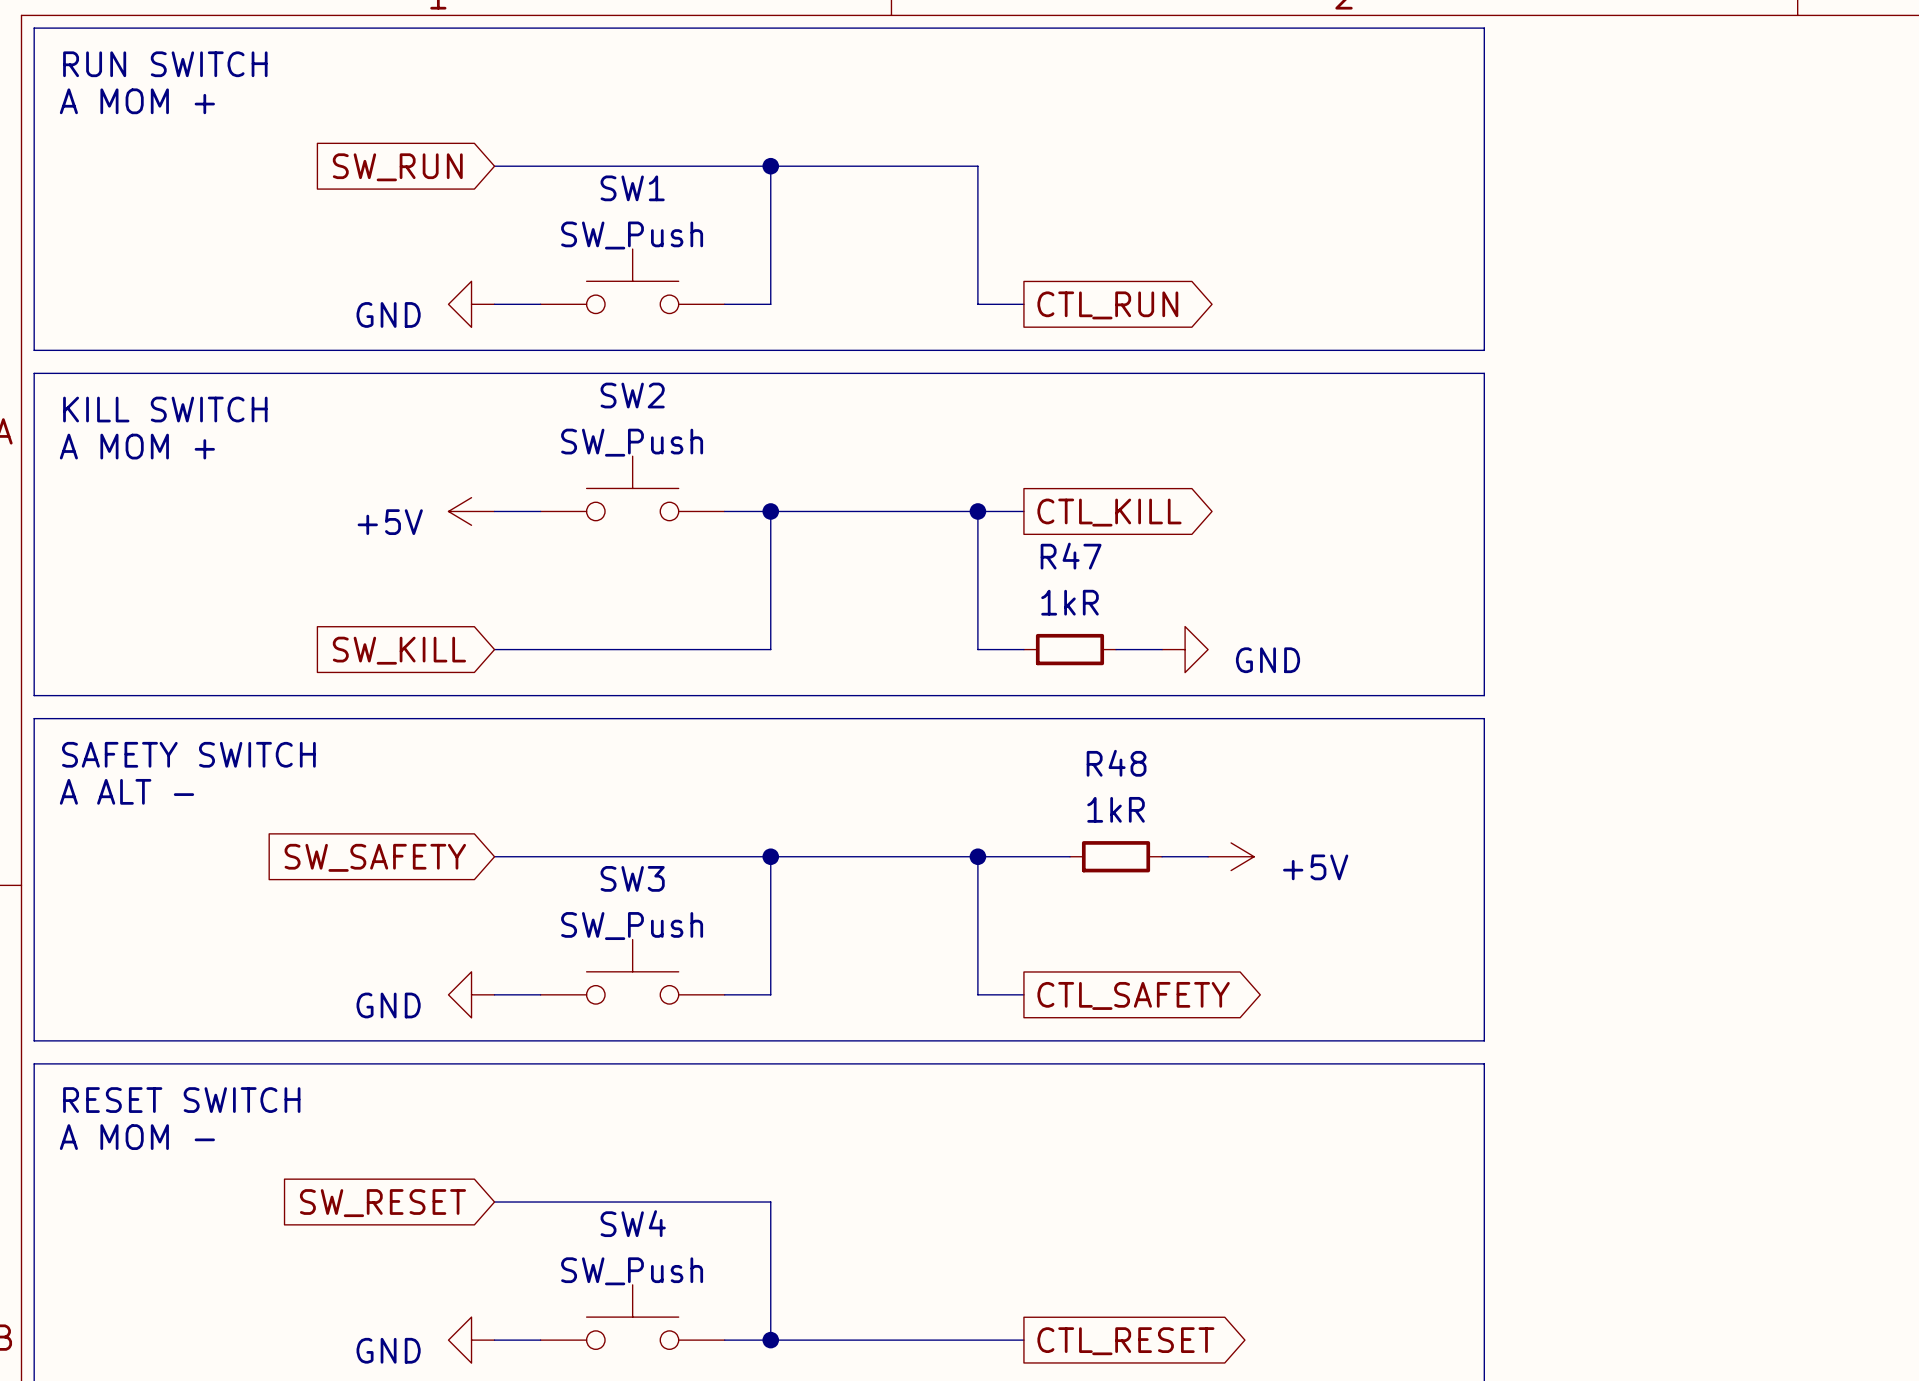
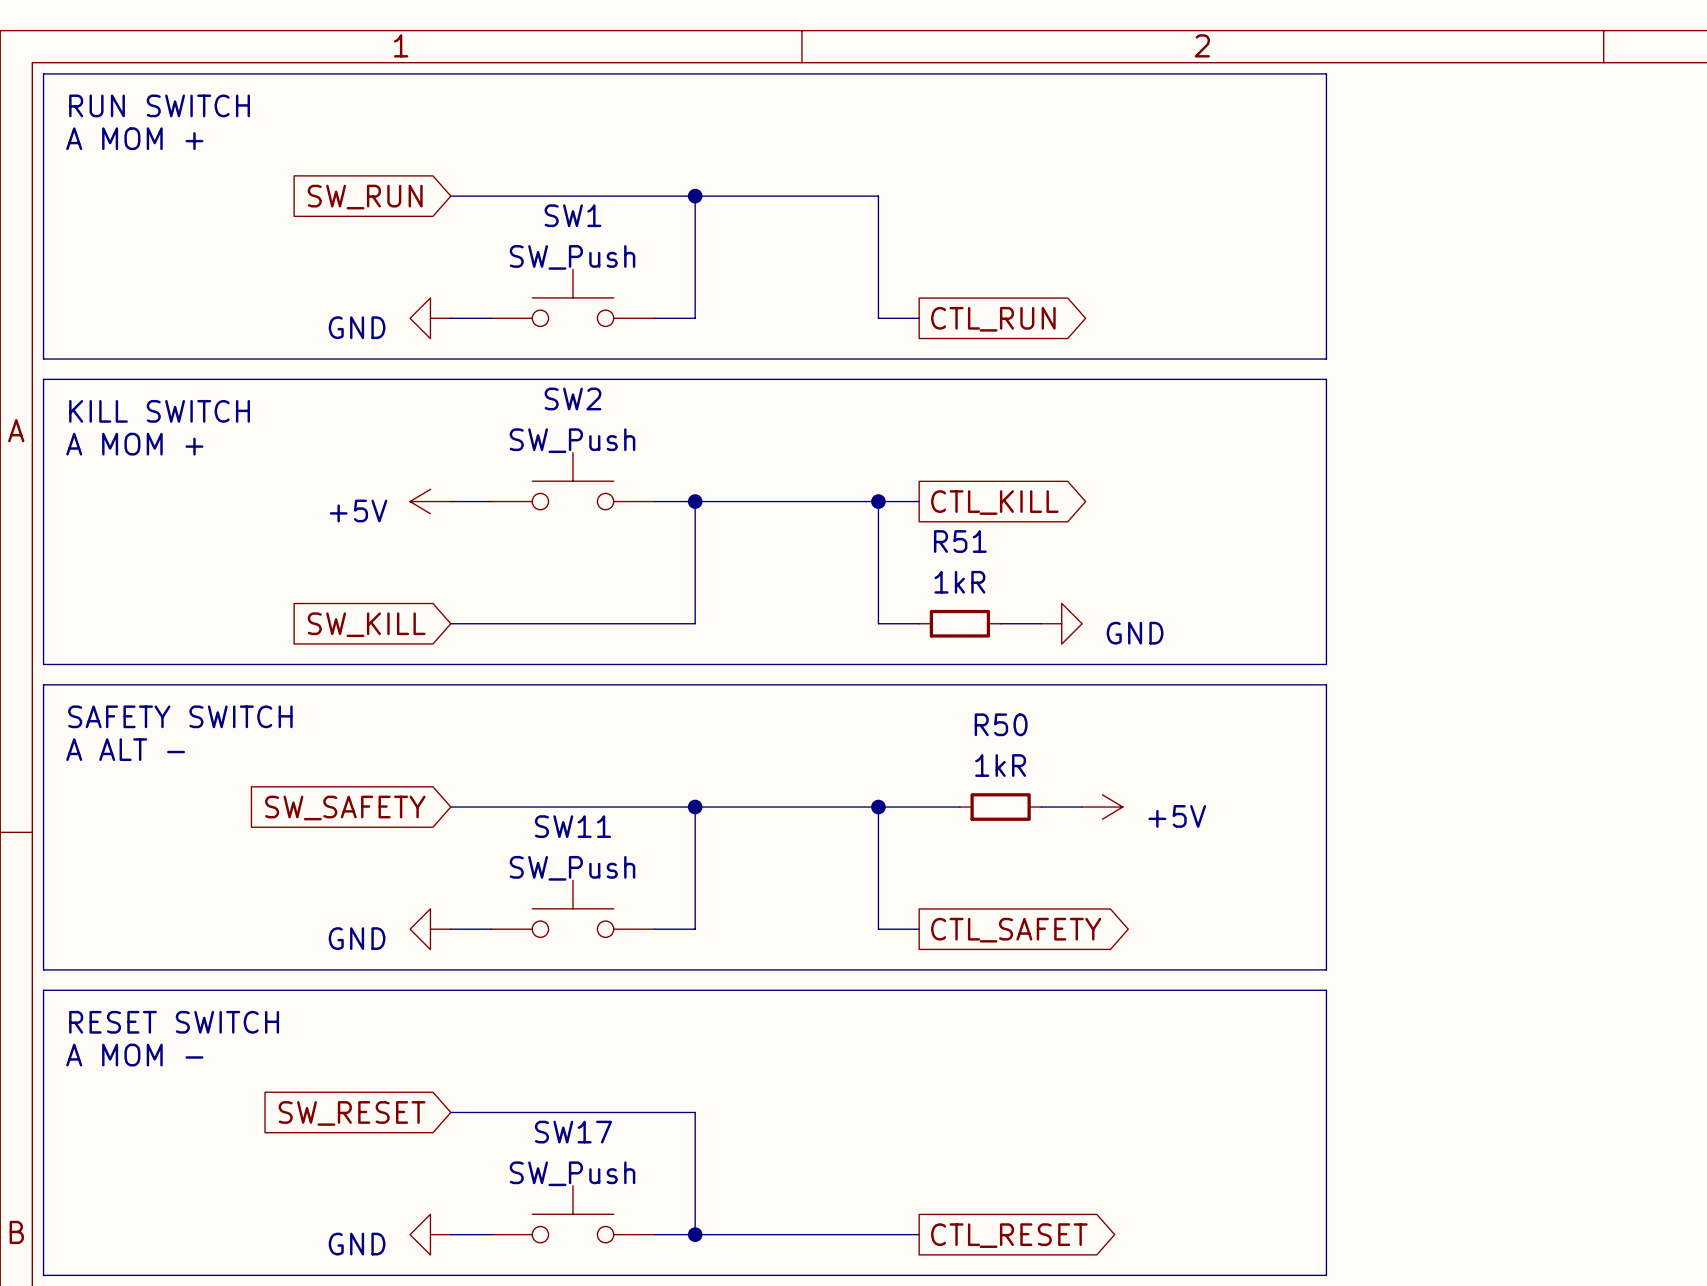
R47 name: R47 (1071, 556) -> R51 (960, 541)
R48 name: R48 (1116, 763) -> R50 (1001, 724)
SW3 name: SW3 (632, 878) -> SW11 (572, 826)
SW4 name: SW4 (633, 1223) -> SW17 (573, 1132)

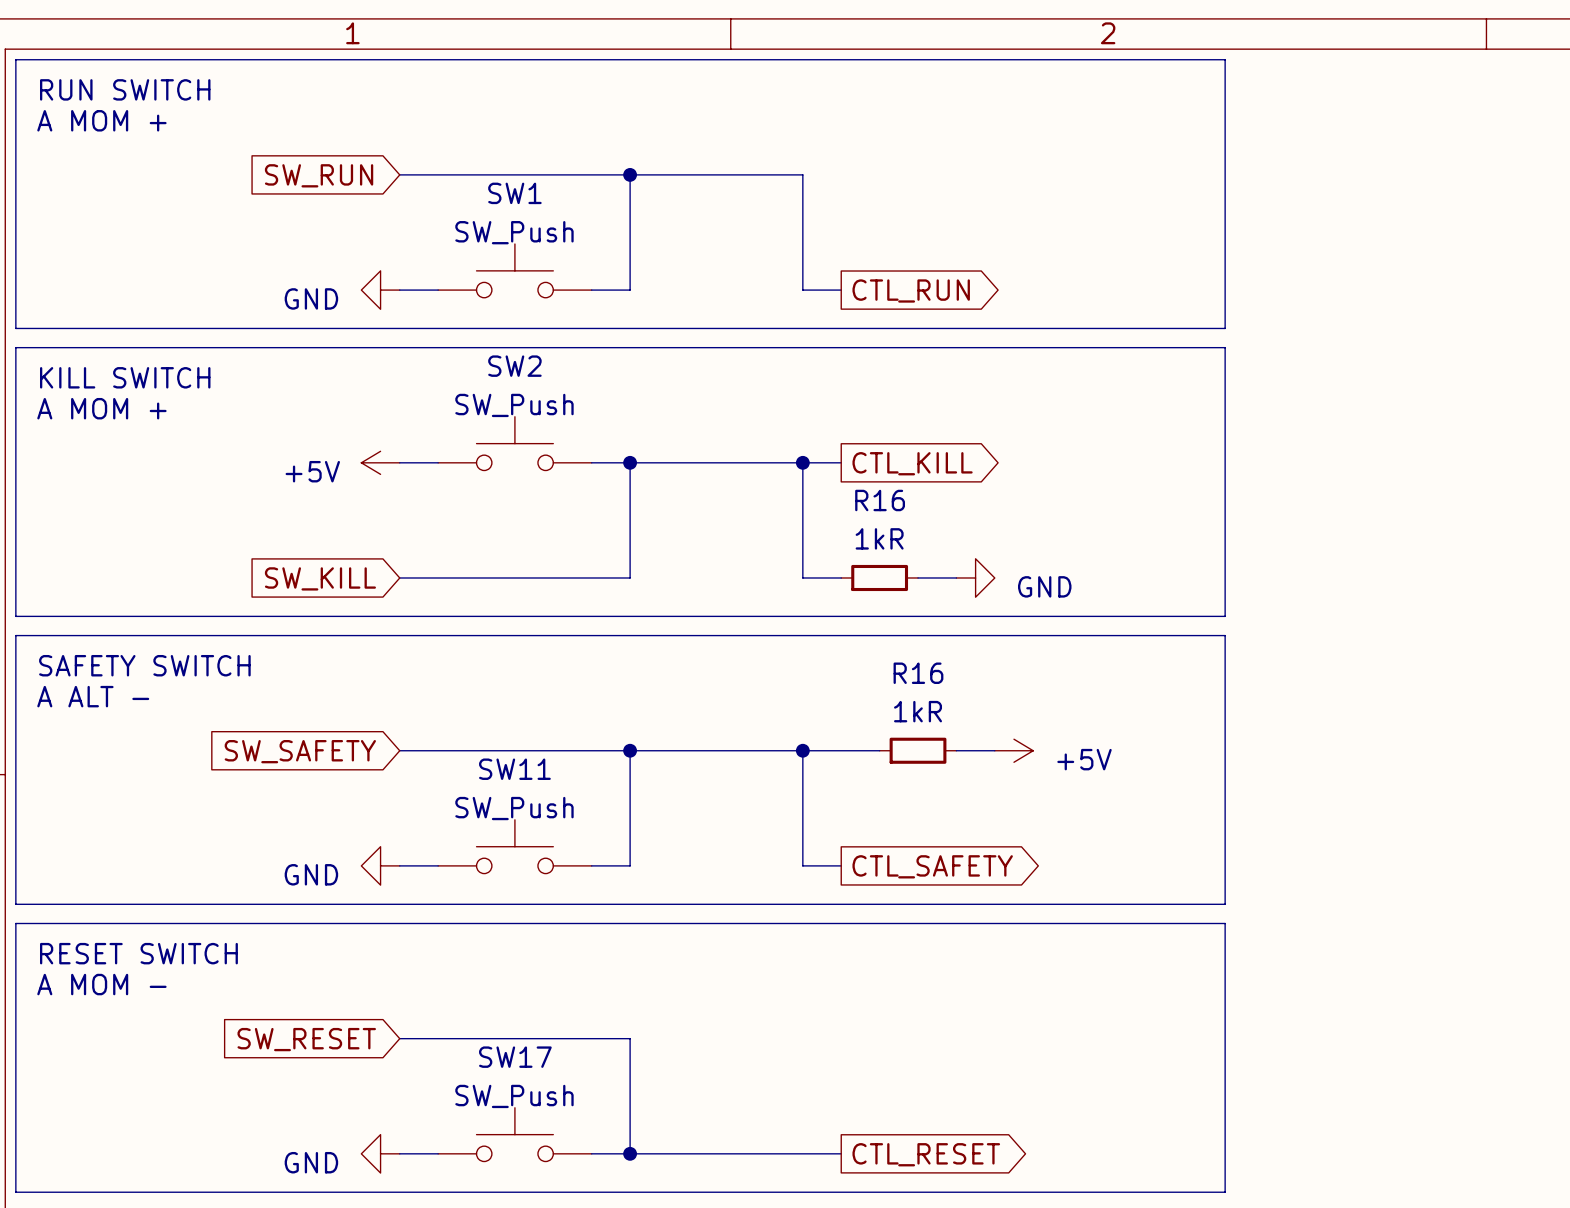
R51 name: R51 (960, 541) -> R16 (880, 500)
R50 name: R50 (1001, 724) -> R16 (918, 673)

